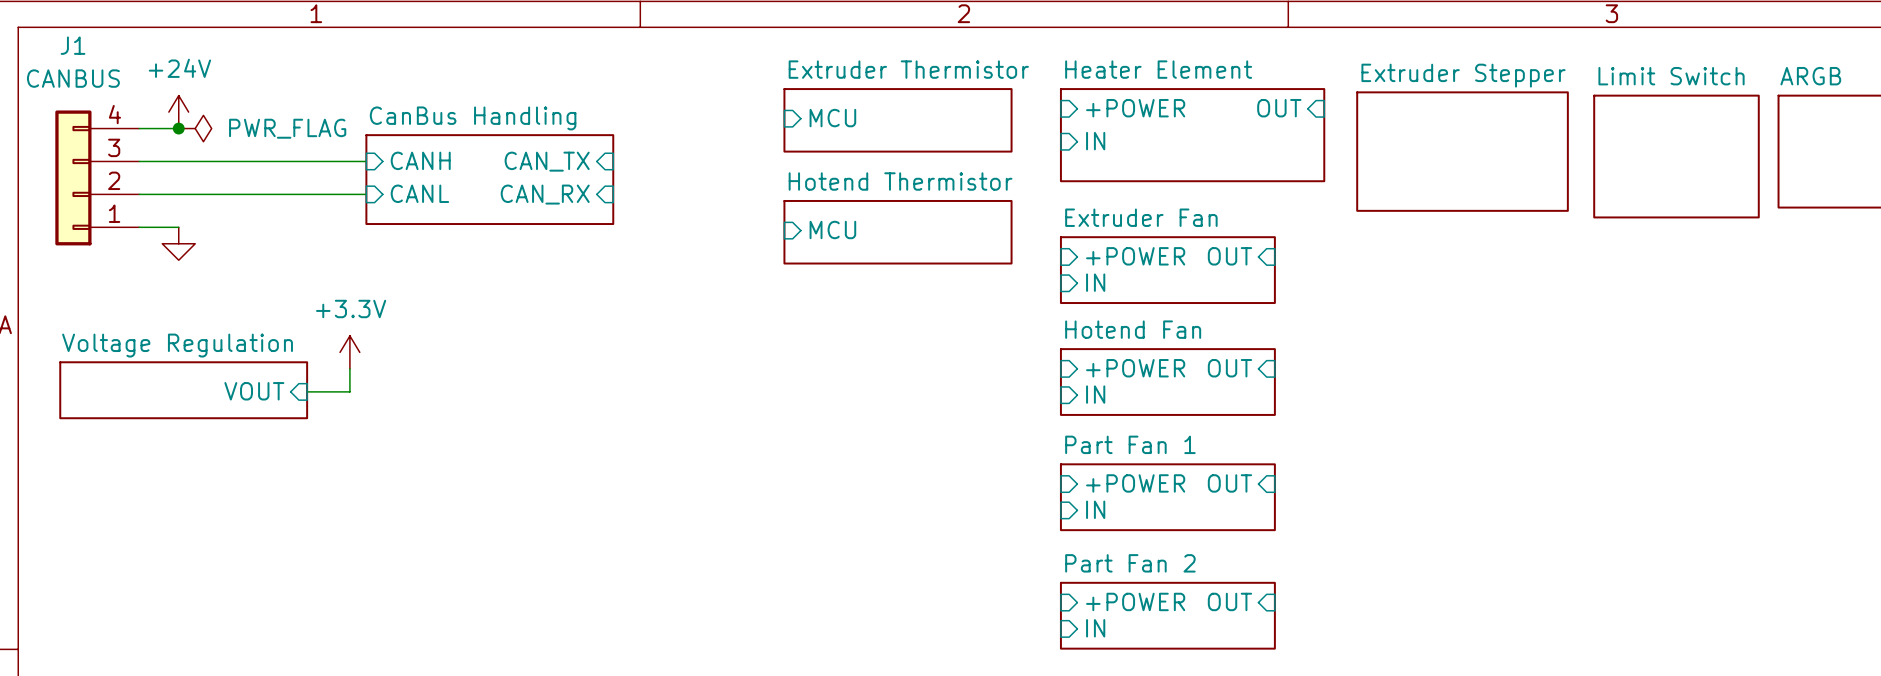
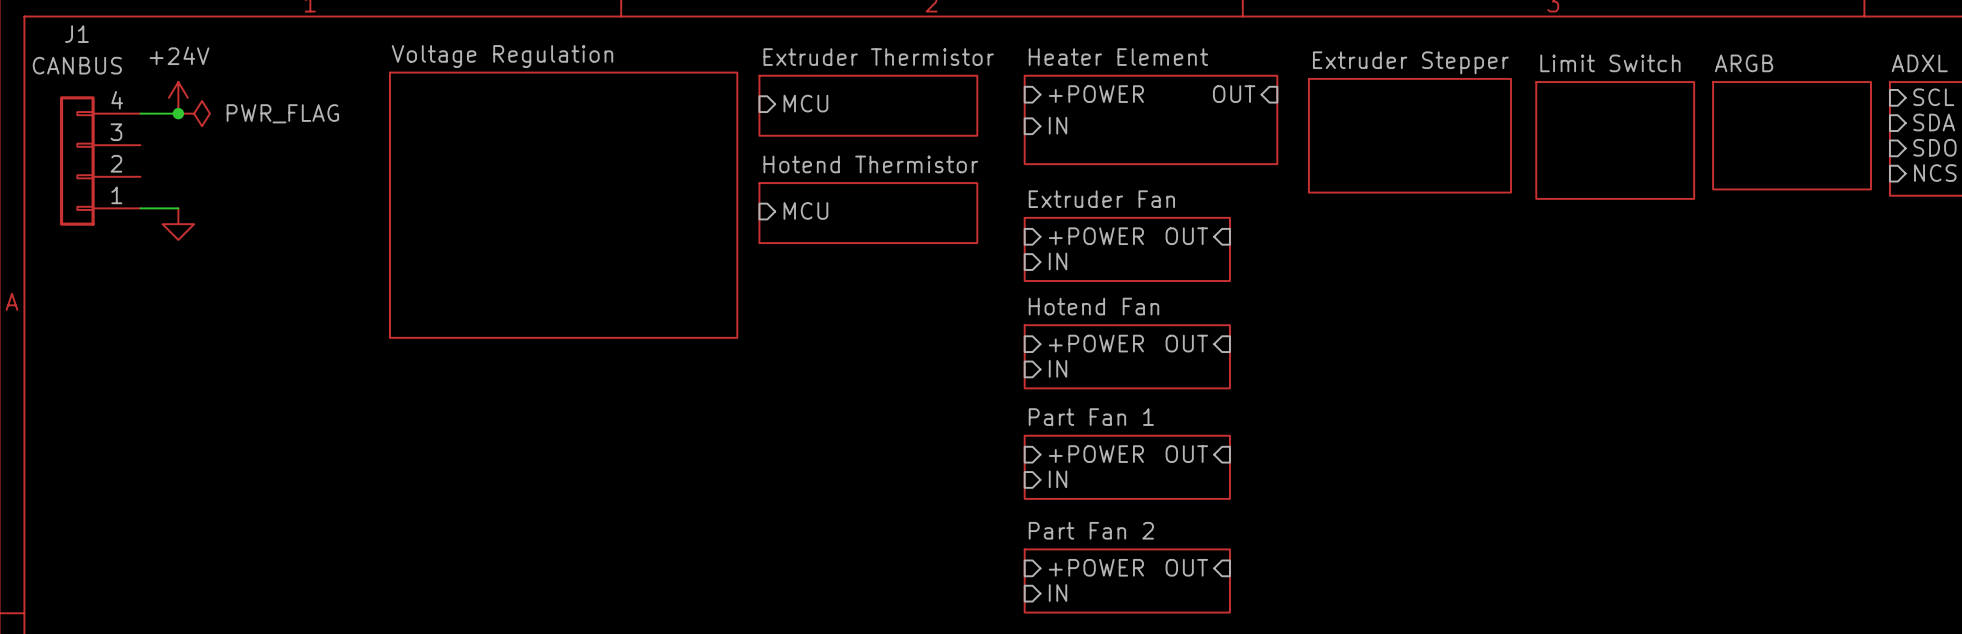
sheet pin: CANH (420, 160) -> none
wire: (139, 161) (366, 161) -> none
sheet pin: CAN_TX (547, 161) -> none
sheet CanBus Handling: (489, 179) -> none
sheet pin: CANL (419, 193) -> none
wire: (139, 194) (366, 194) -> none
sheet pin: CAN_RX (545, 194) -> none
sheet Voltage Regulation: none -> (563, 205)
power symbol: +3.3V (349, 352) -> none
wire: (349, 368) (349, 391) (307, 391) -> none
sheet Voltage Regulation: (183, 390) -> none
sheet pin: VOUT (254, 391) -> none

